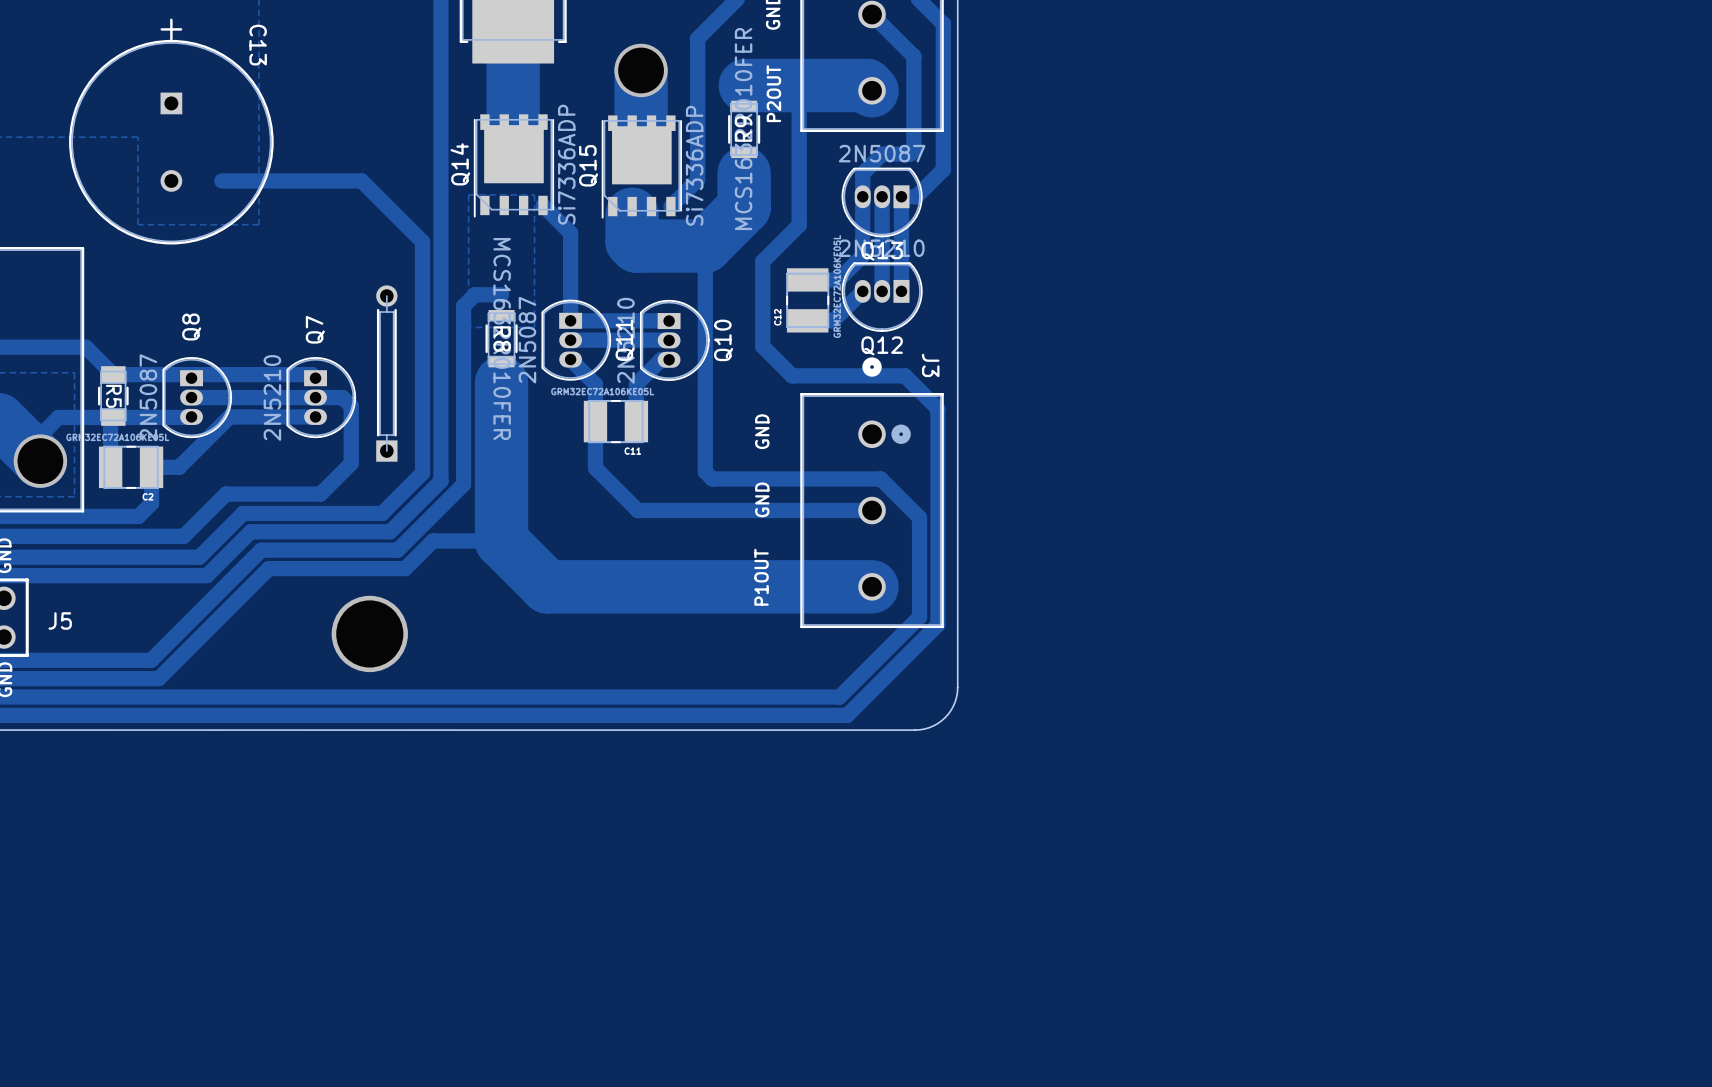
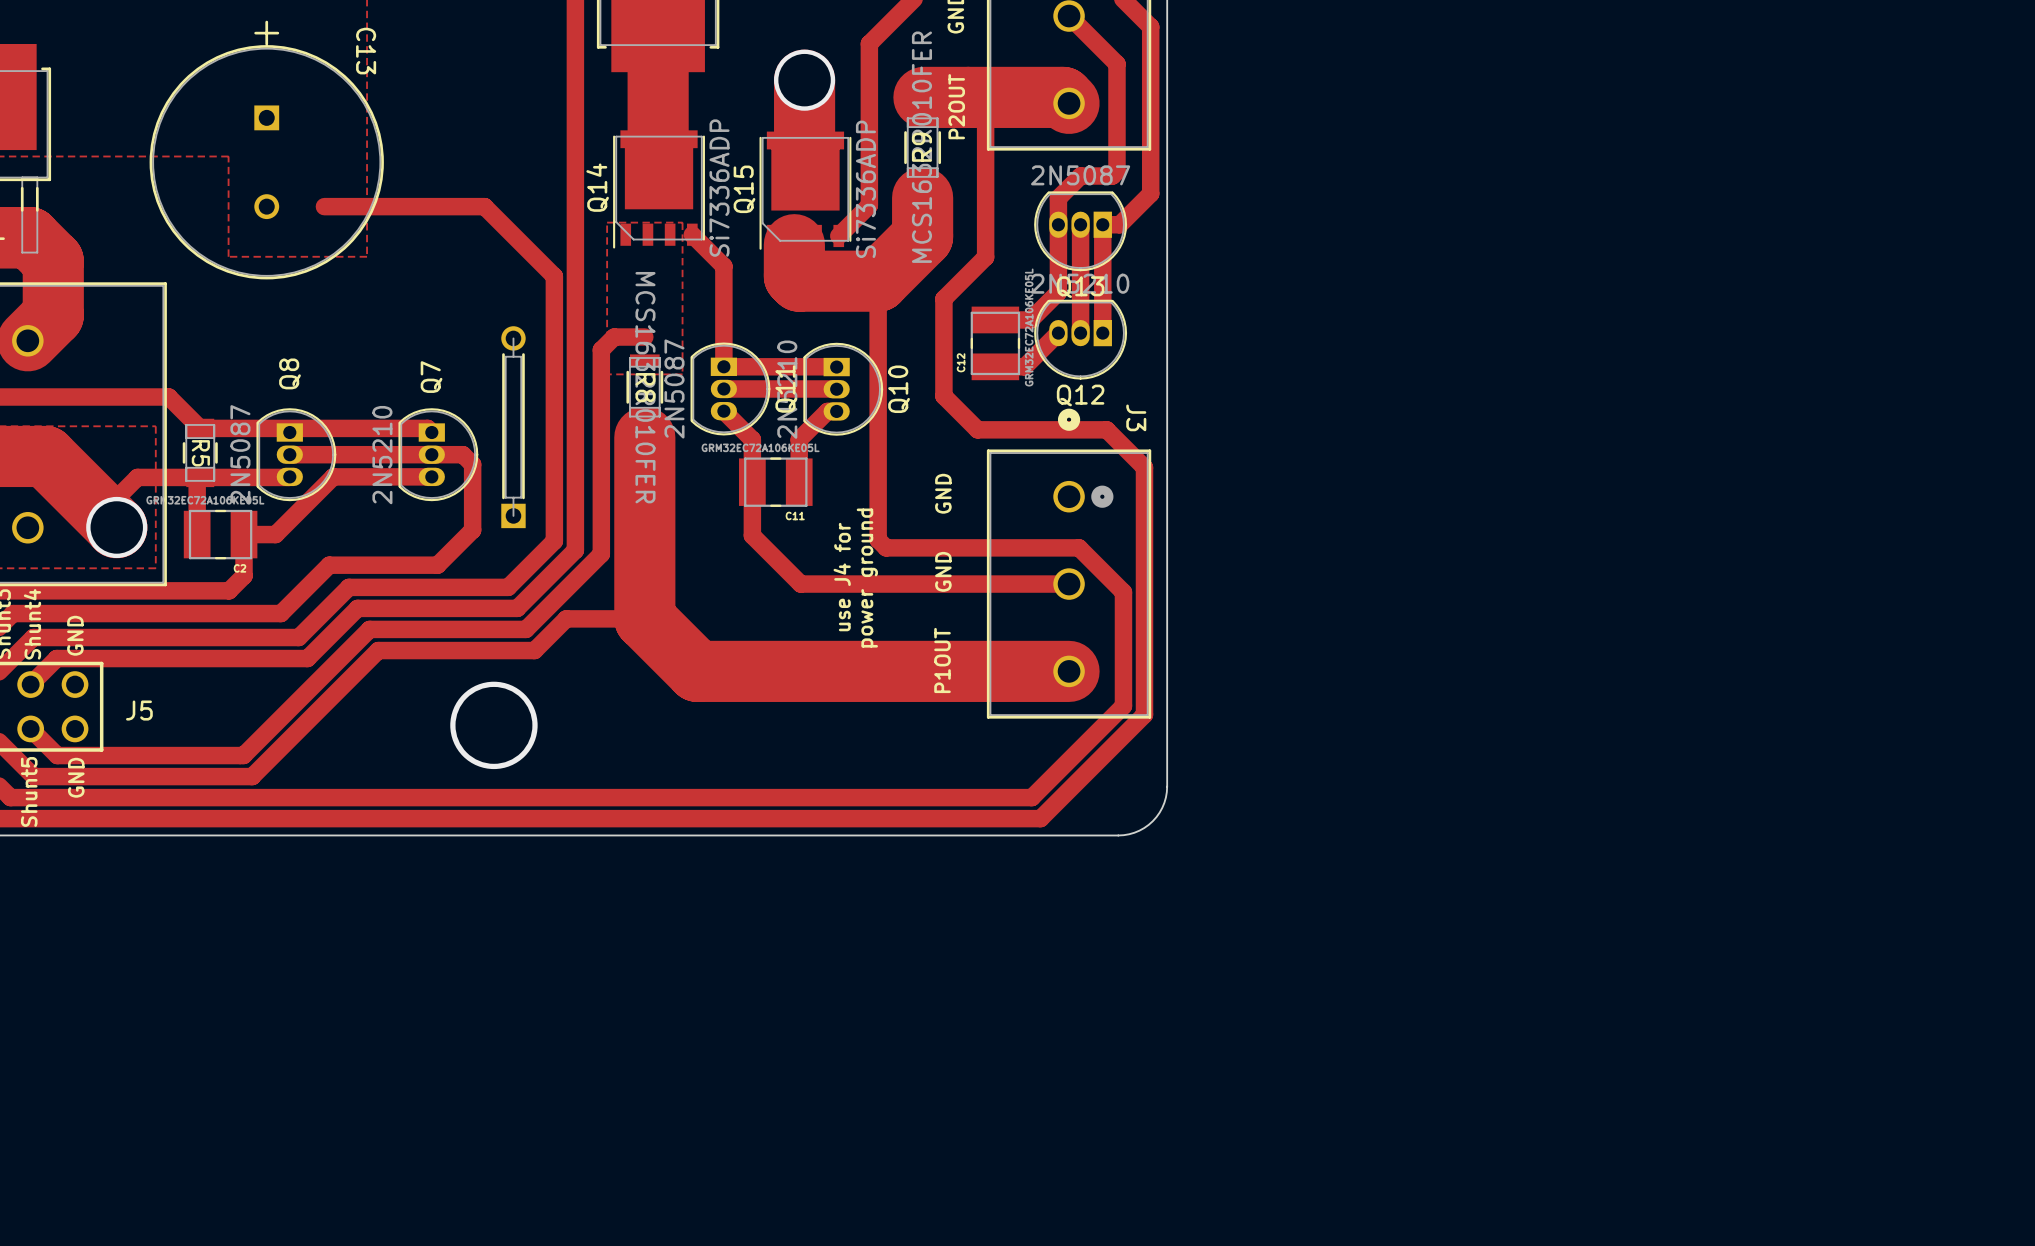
text: none -> use J4 for (842, 577)
text: none -> power ground (867, 578)

